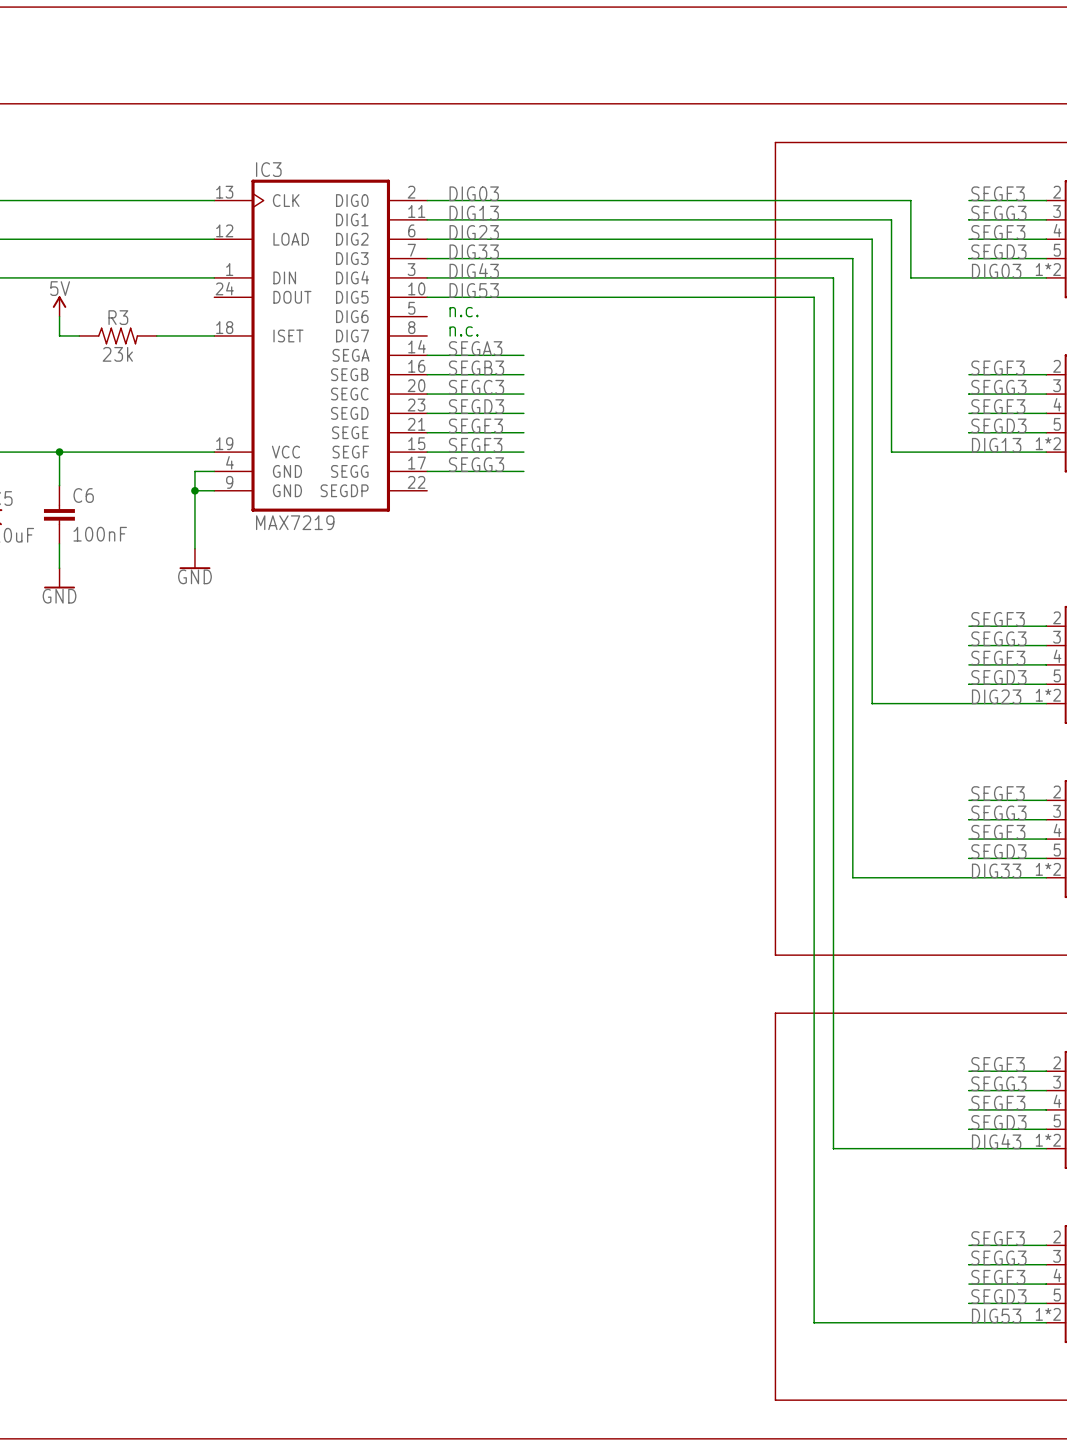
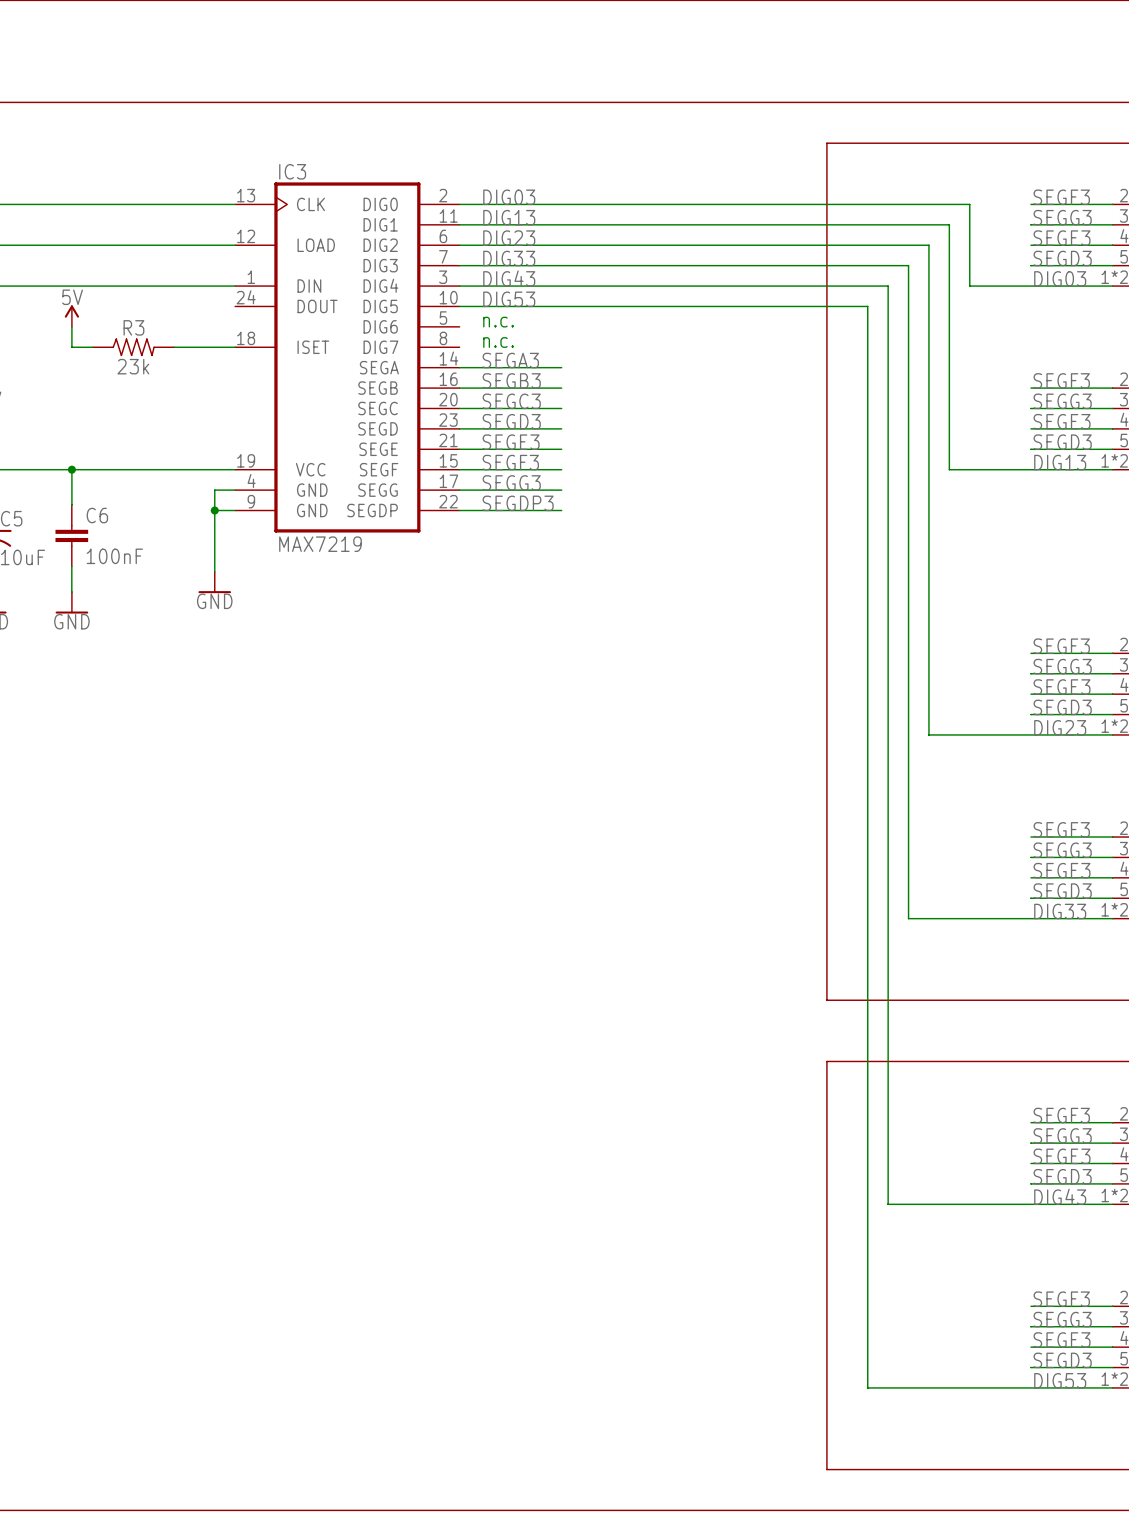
label: none -> SEGDP3 (518, 503)
wire: none -> (459, 510) (561, 510)

